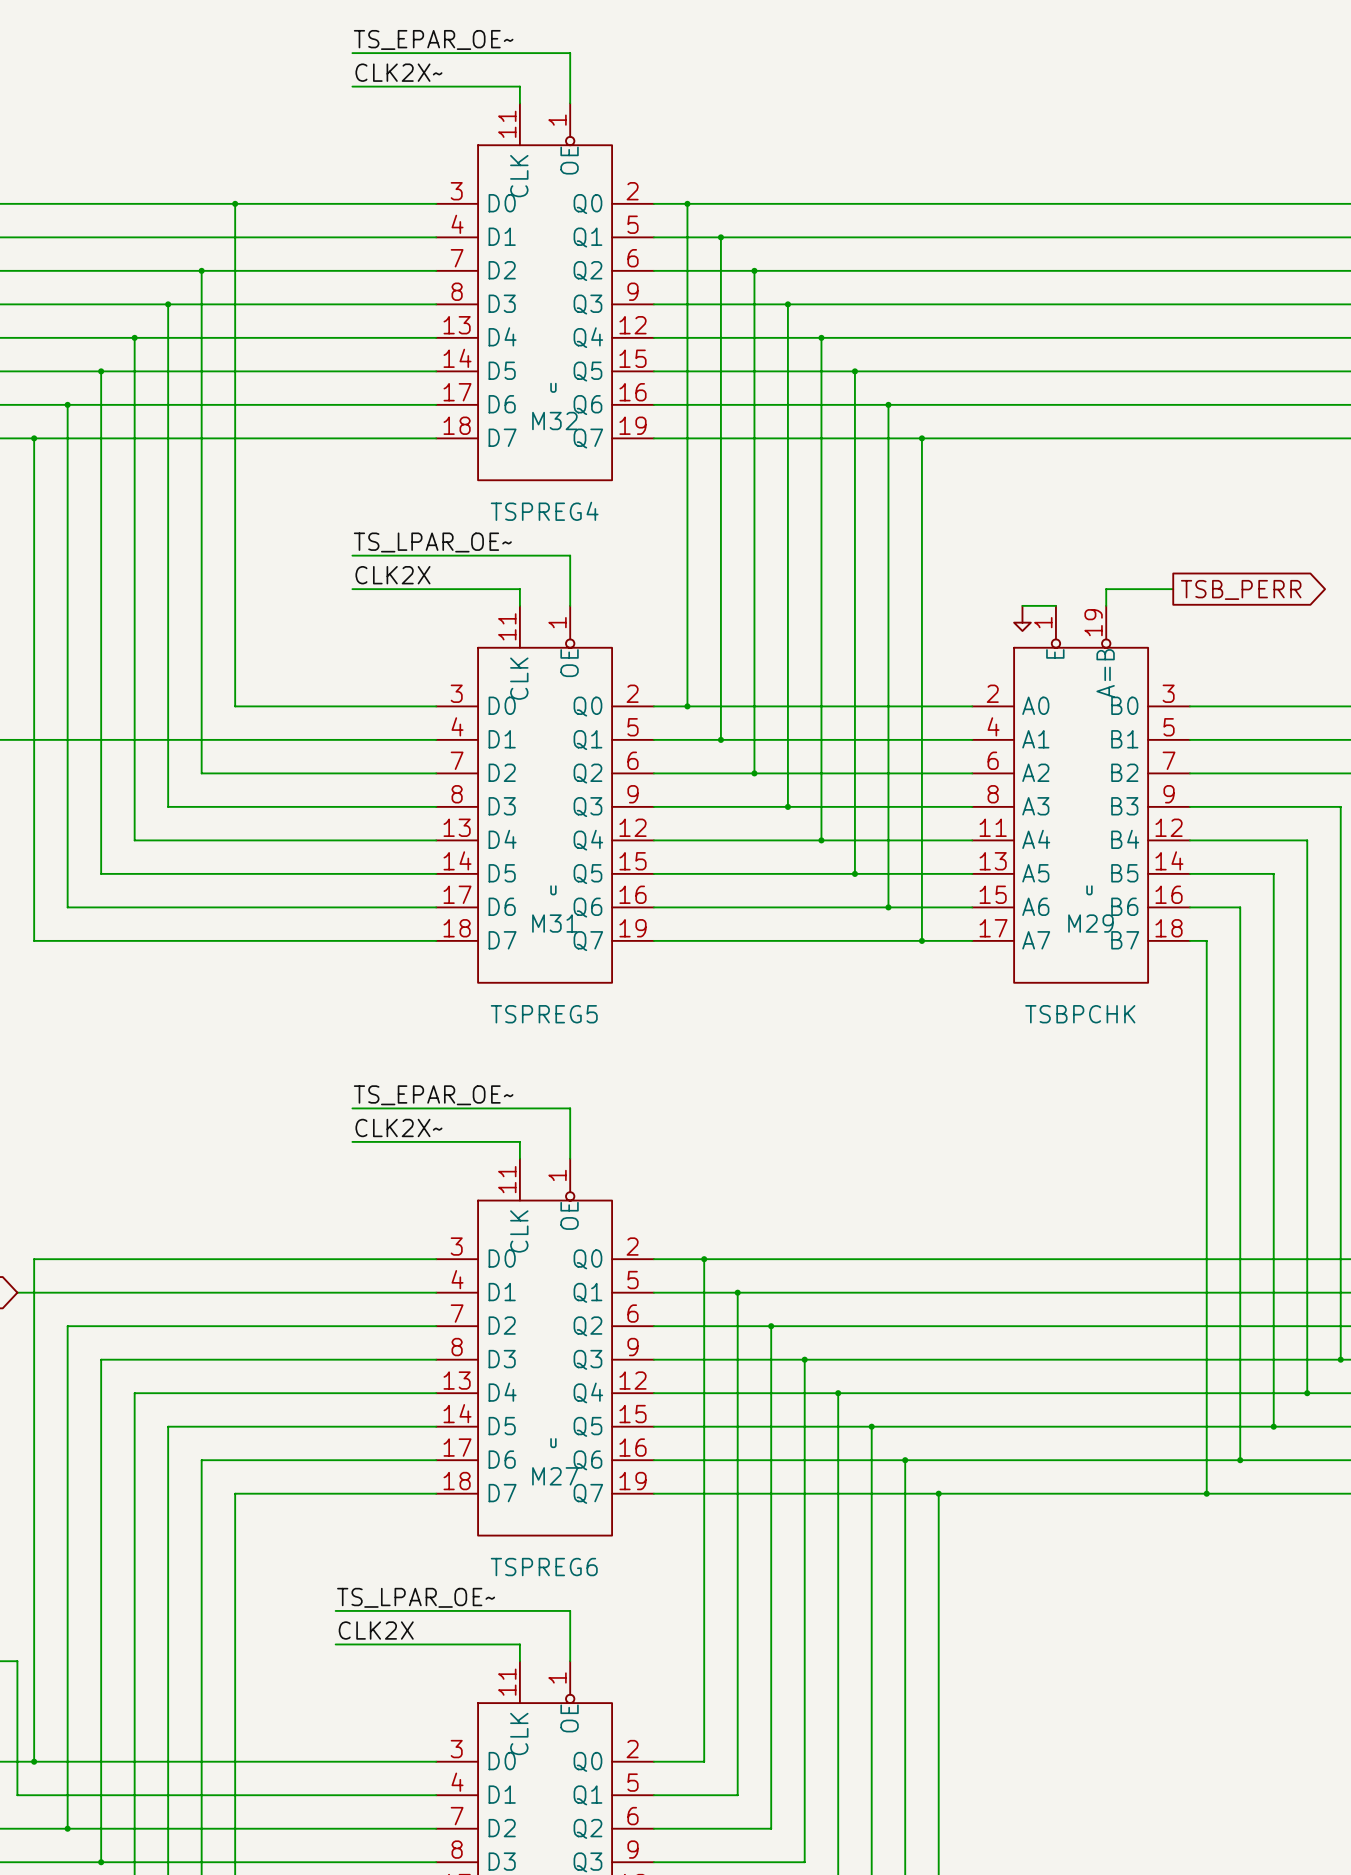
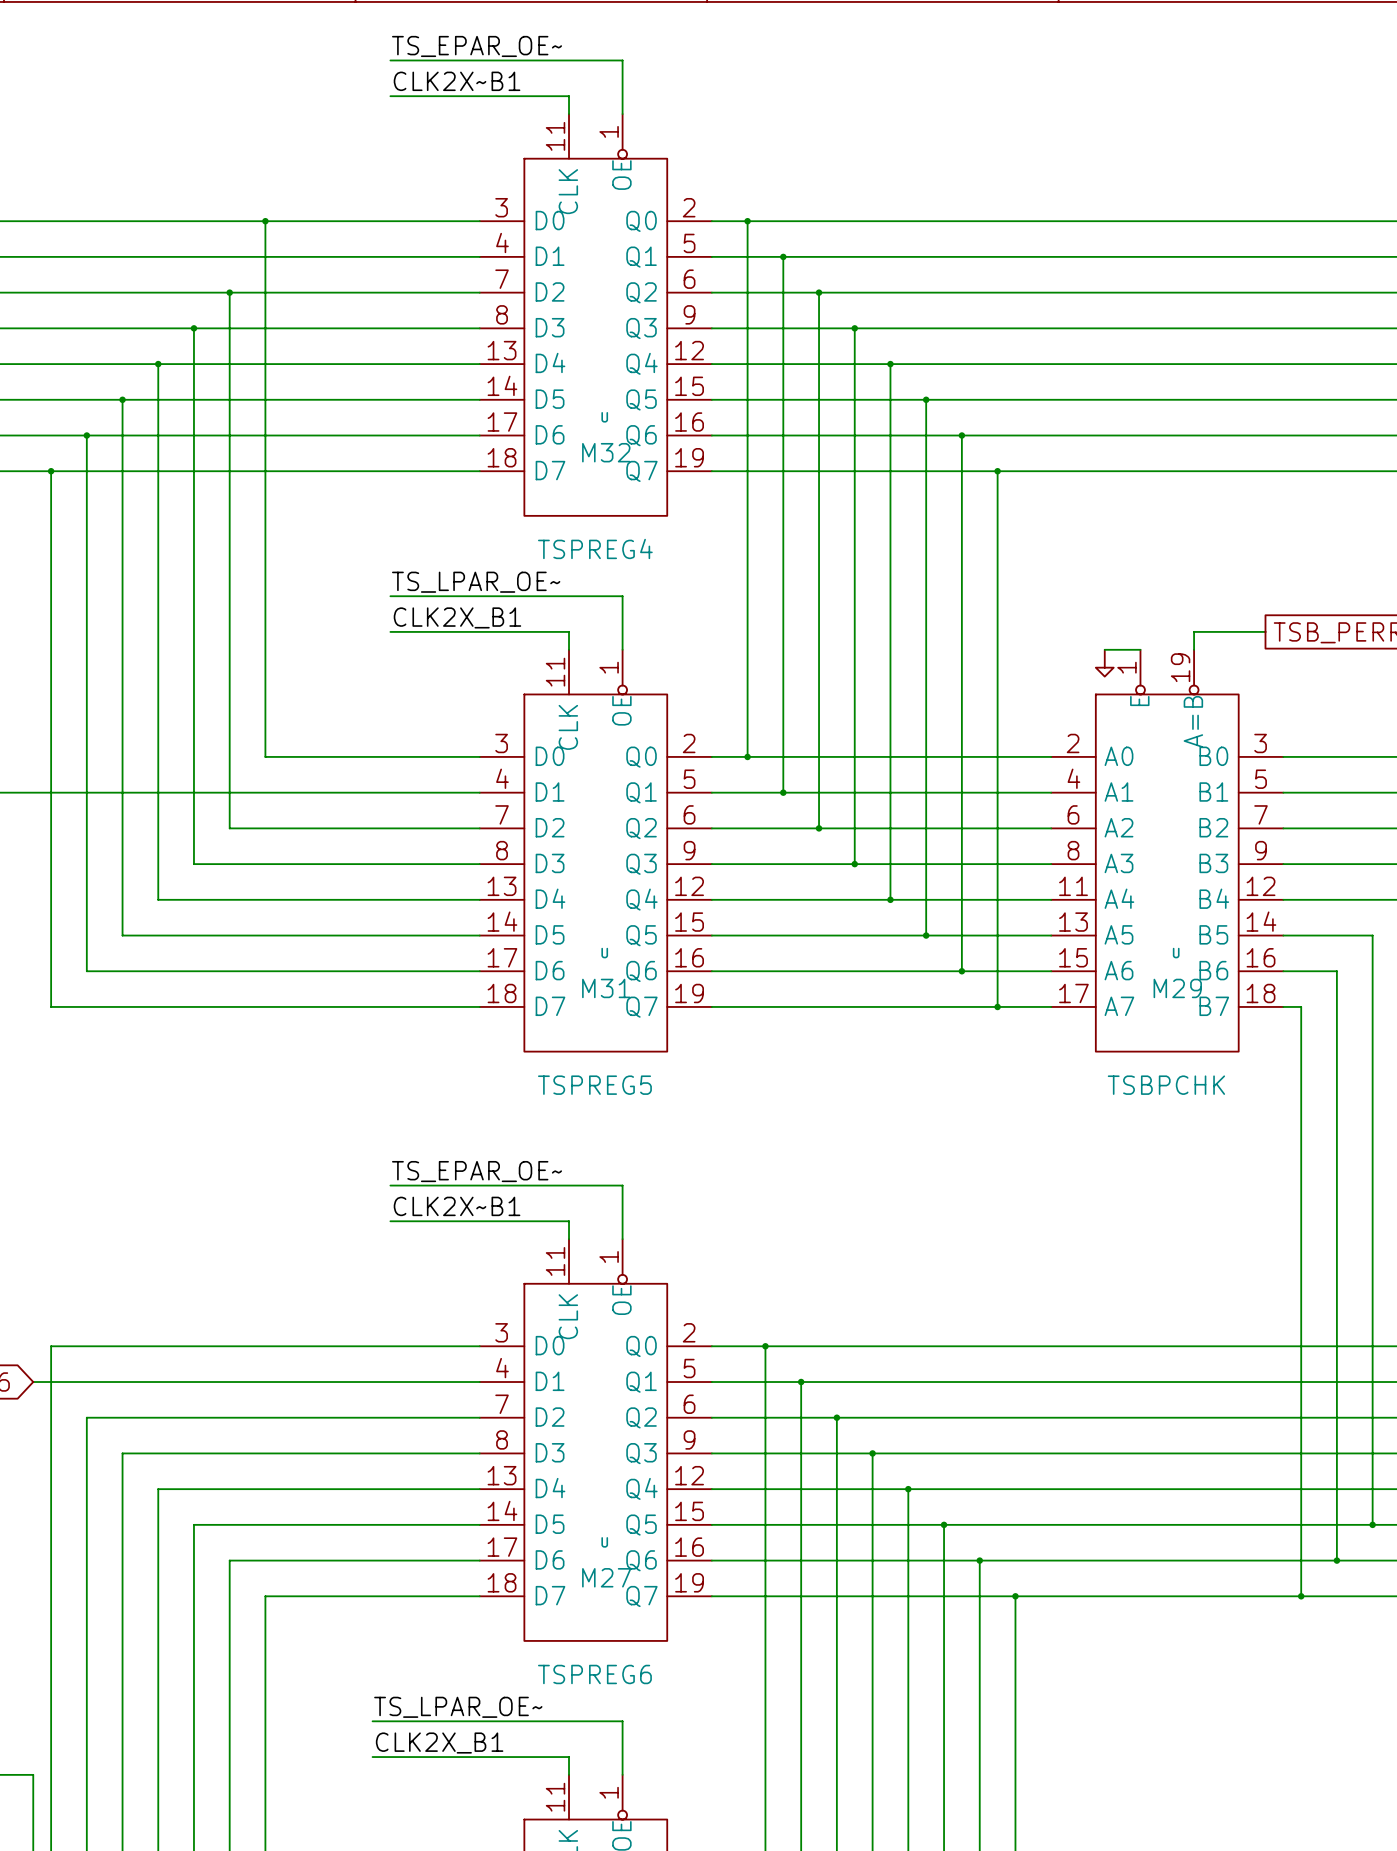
label: CLK2X~ (398, 72) -> CLK2X~B1 (457, 81)
label: CLK2X (392, 575) -> CLK2X_B1 (457, 617)
label: CLK2X~ (398, 1127) -> CLK2X~B1 (457, 1206)
label: CLK2X (376, 1630) -> CLK2X_B1 (439, 1743)

